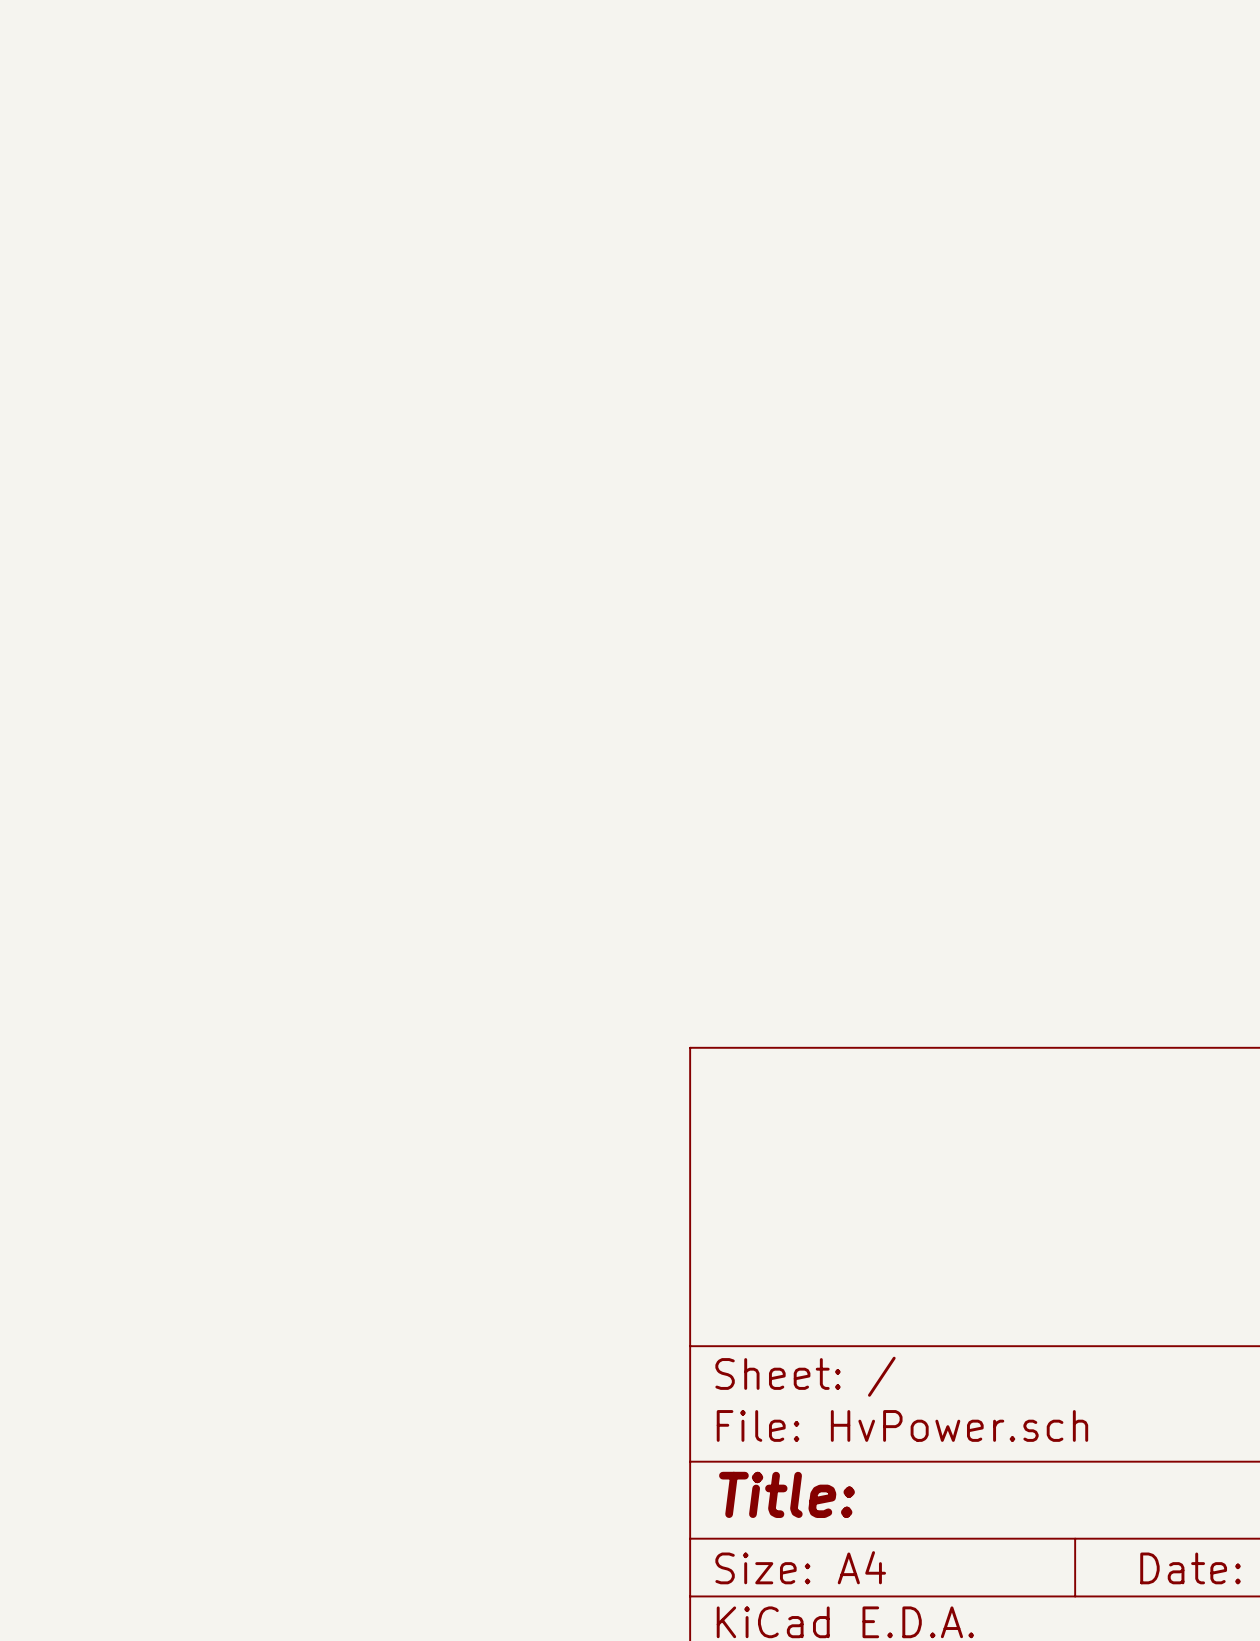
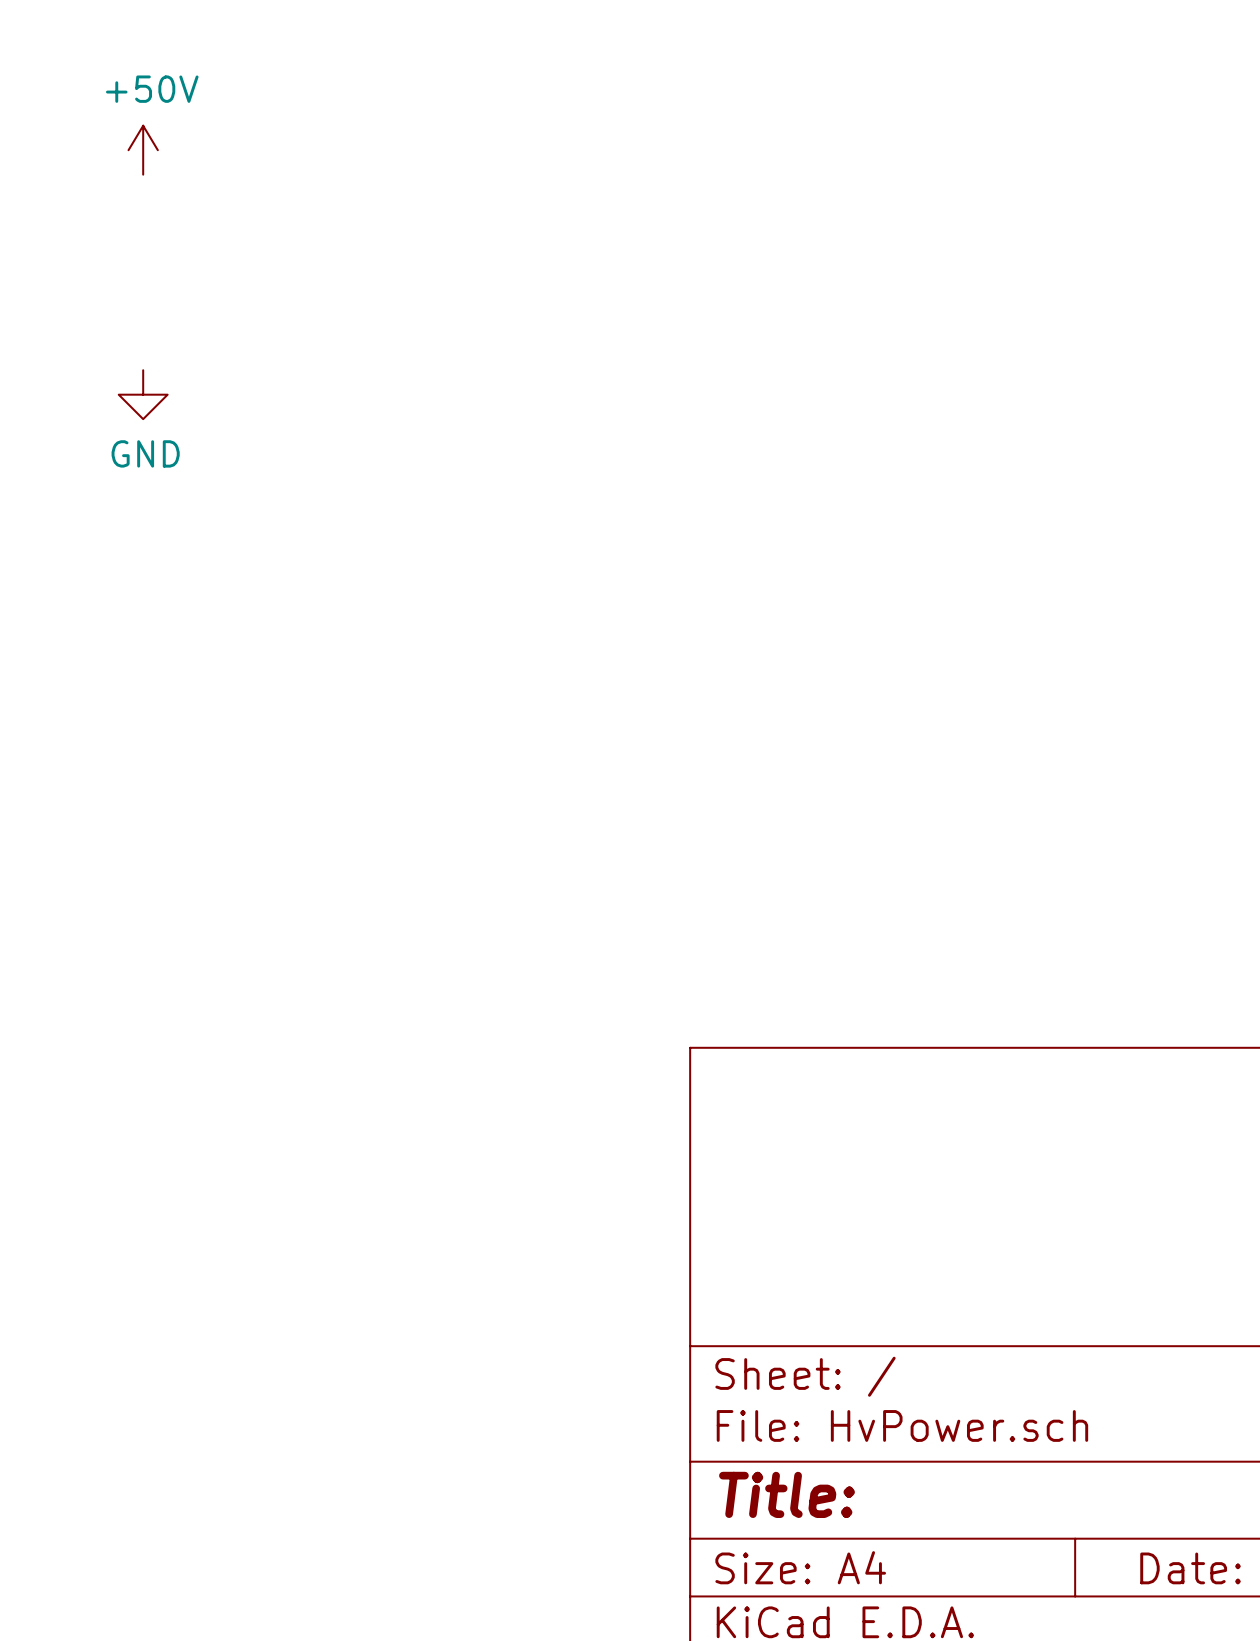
power symbol: none -> +50V (143, 150)
power symbol: none -> GND (143, 394)

